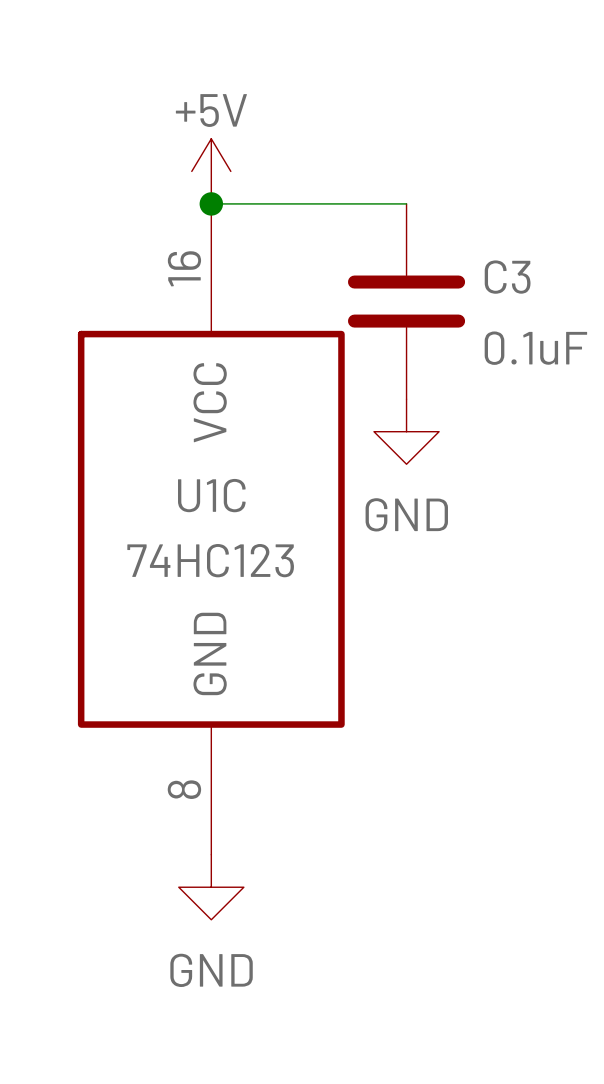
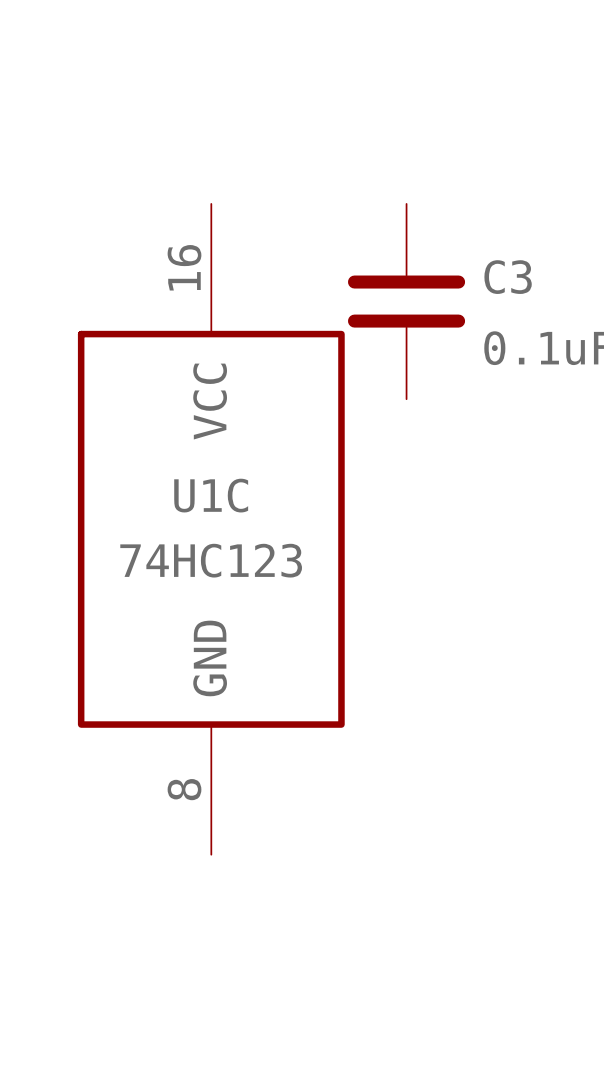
power symbol: +5V (211, 171) -> none
wire: (211, 203) (406, 203) -> none
junction: (211, 203) -> none
power symbol: GND (406, 431) -> none
power symbol: GND (211, 887) -> none

